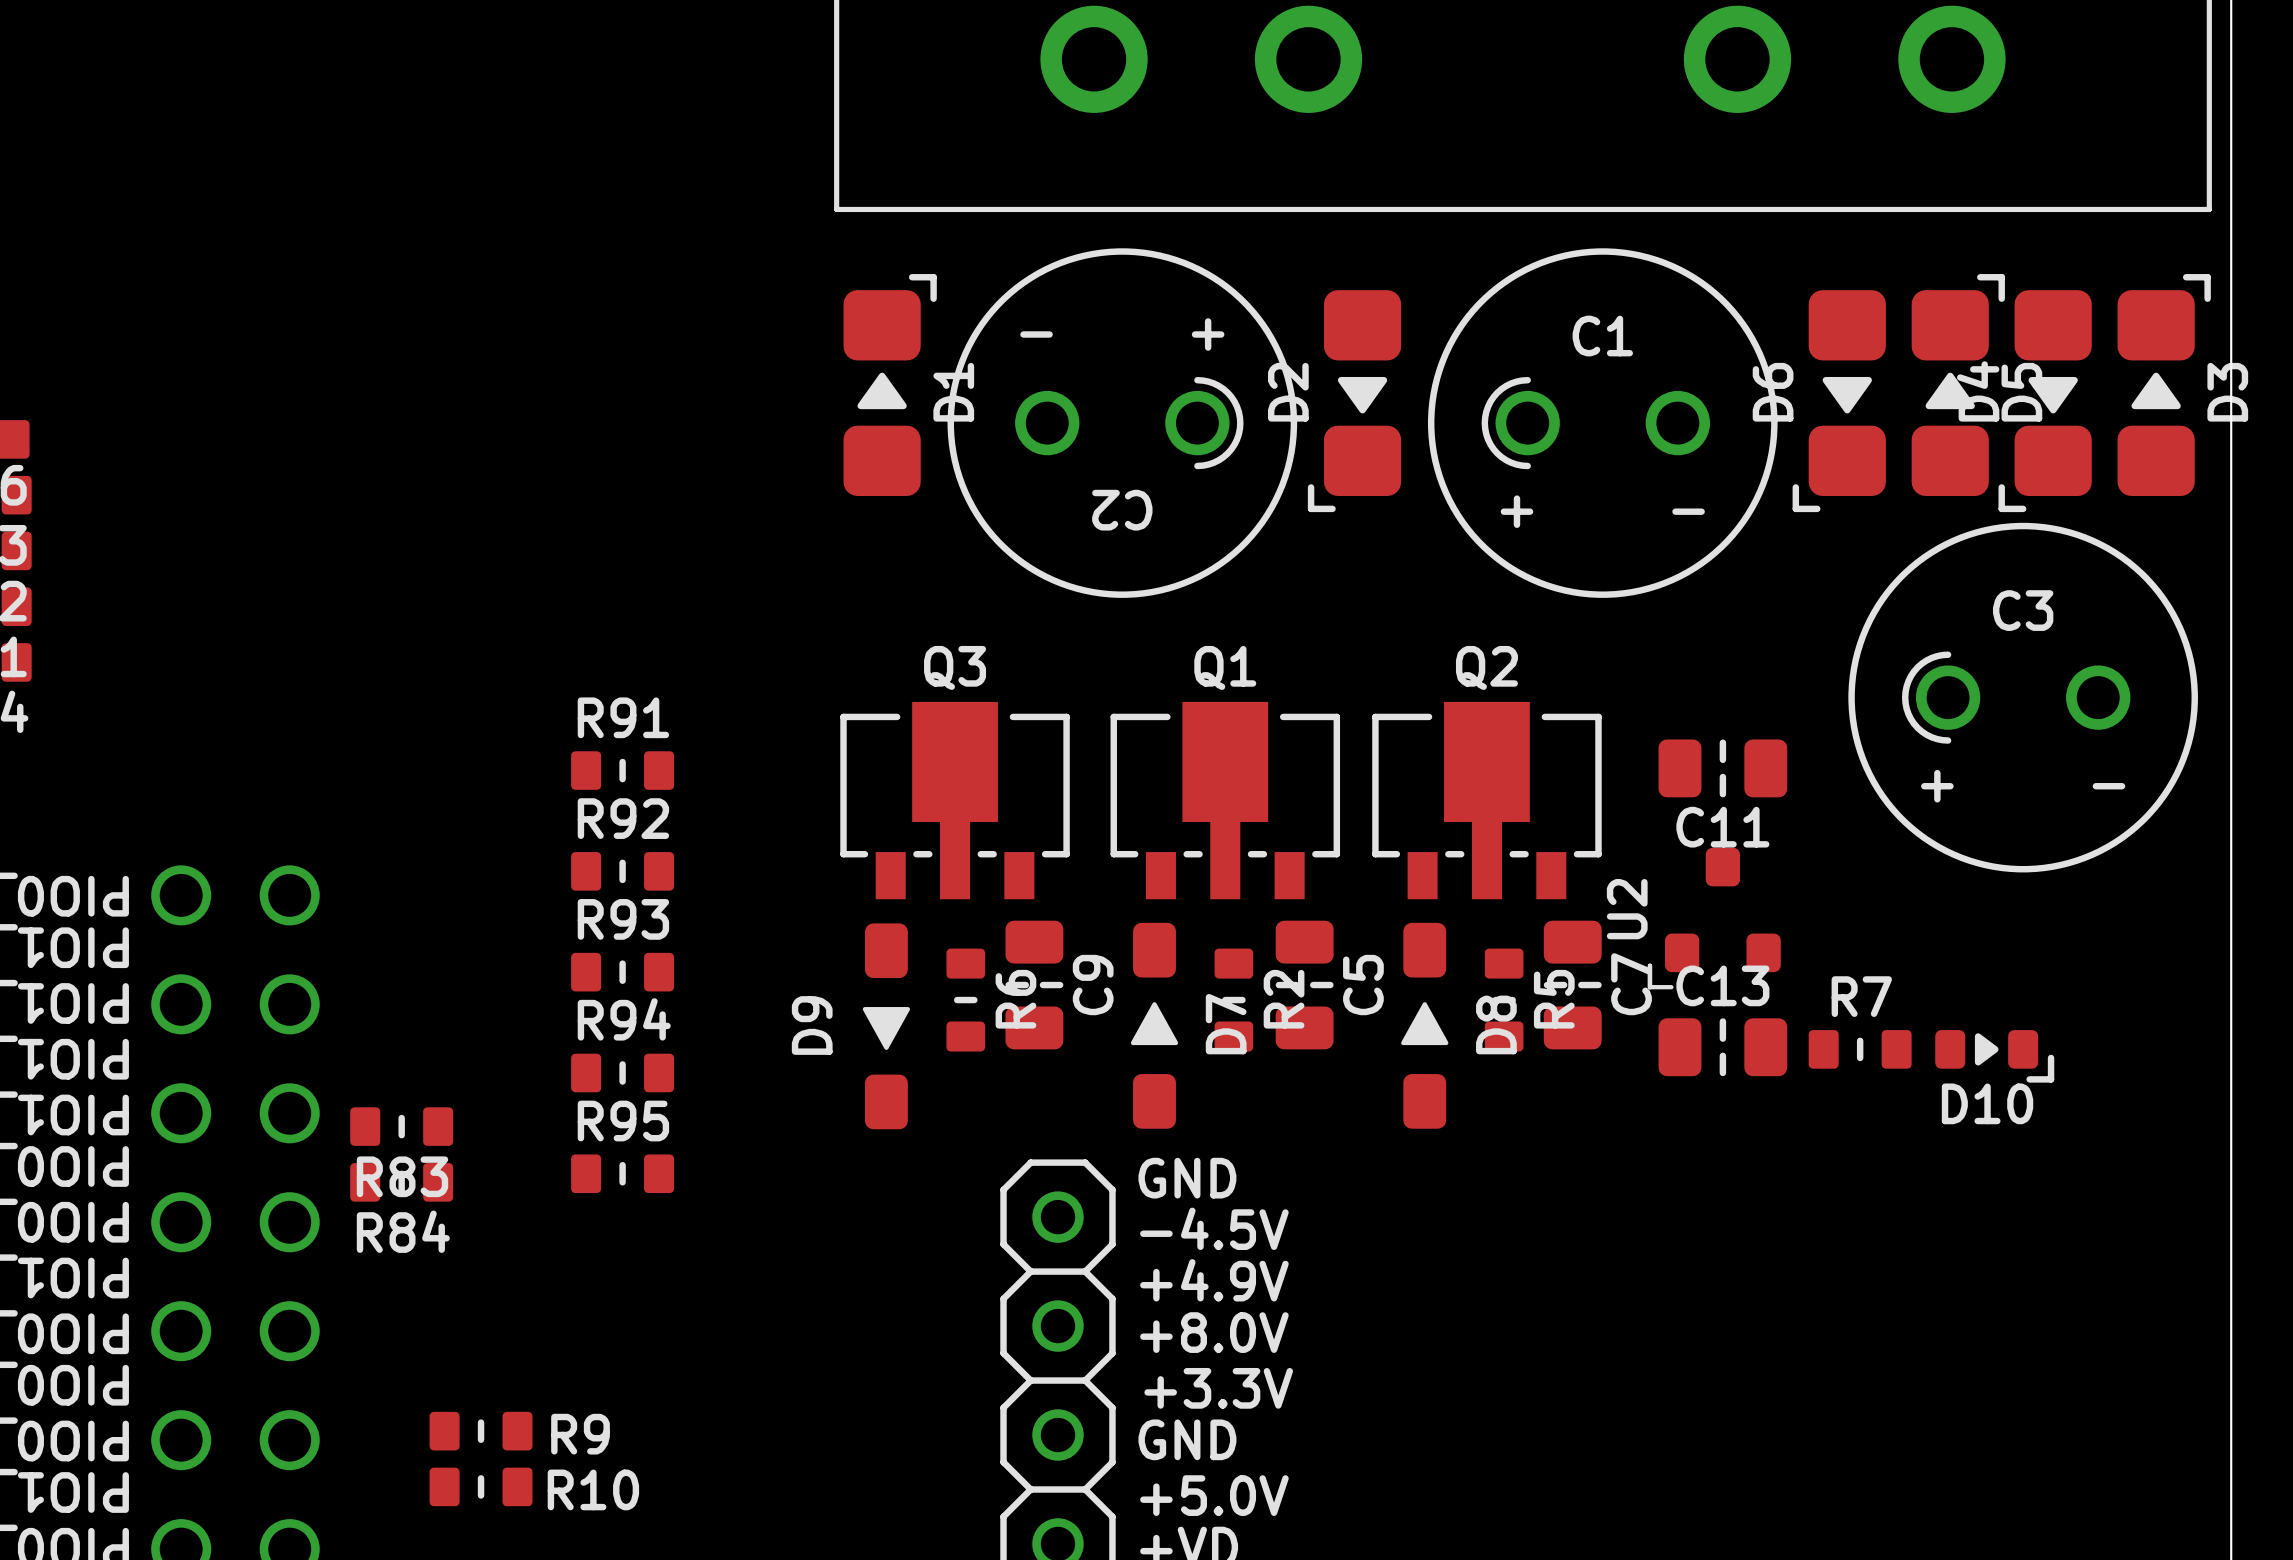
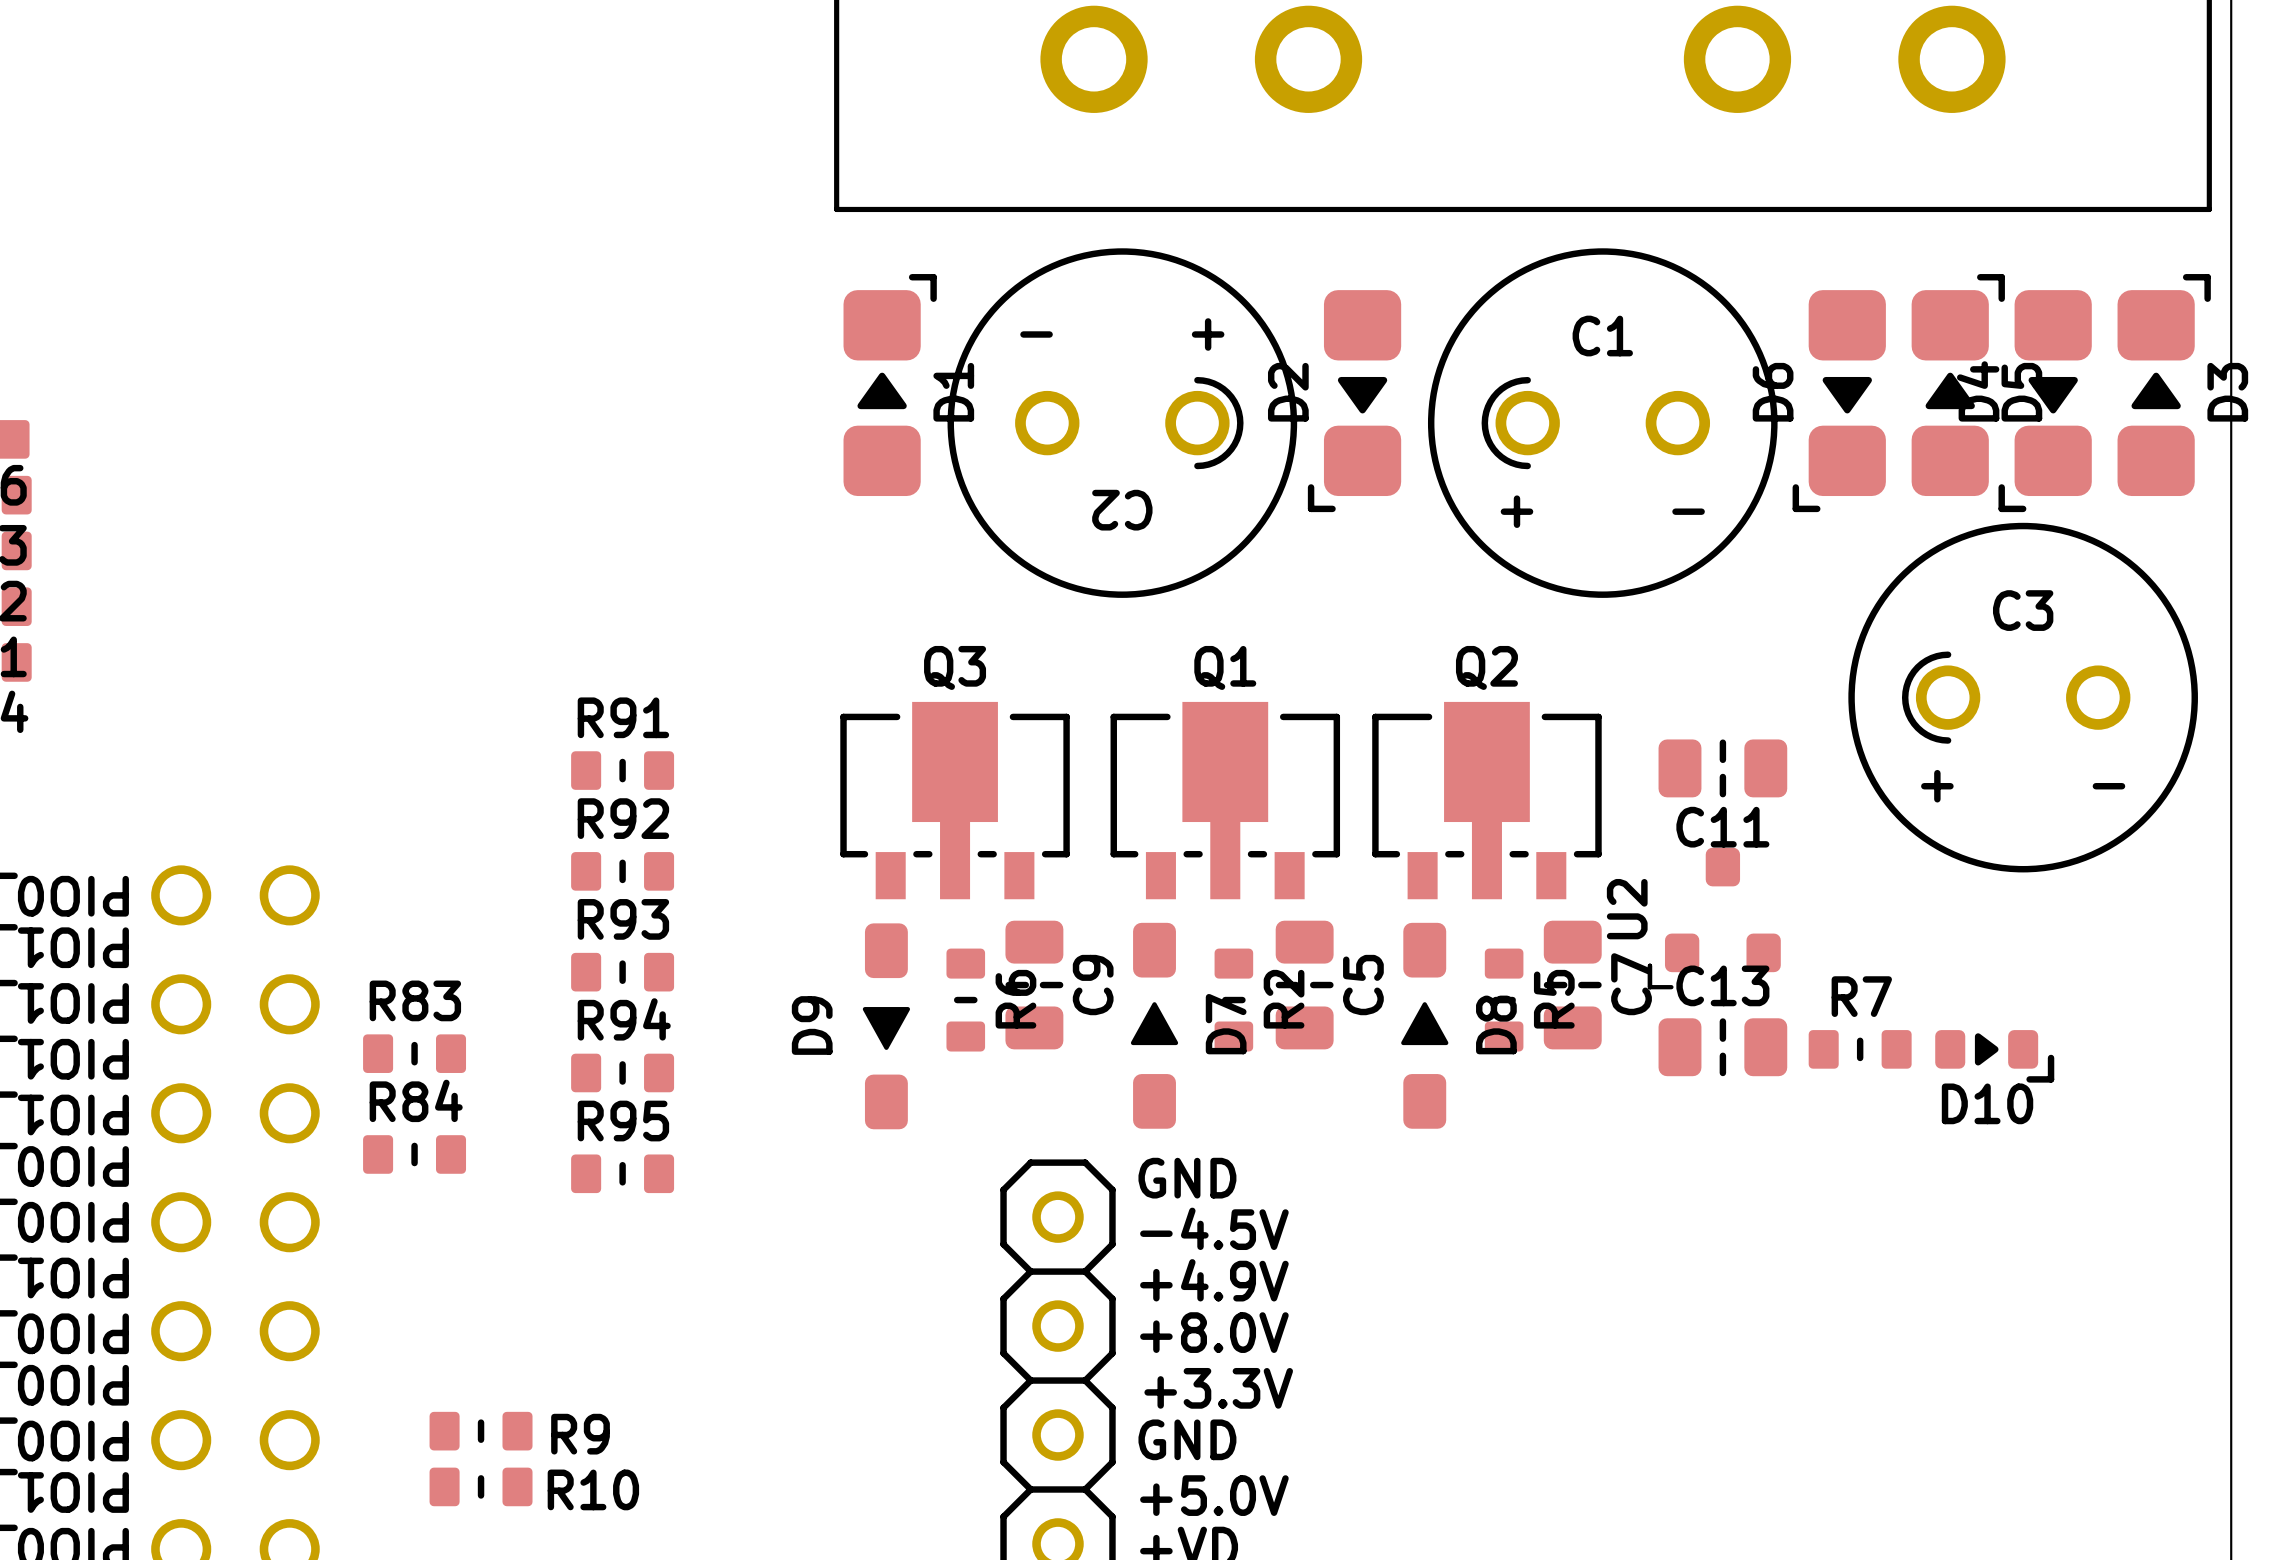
R83 position: (401, 1126) -> (414, 1053)
R83 name position: R83 (402, 1176) -> R83 (415, 1000)
R84 position: (401, 1182) -> (414, 1154)
R84 name position: R84 (403, 1231) -> R84 (416, 1100)

